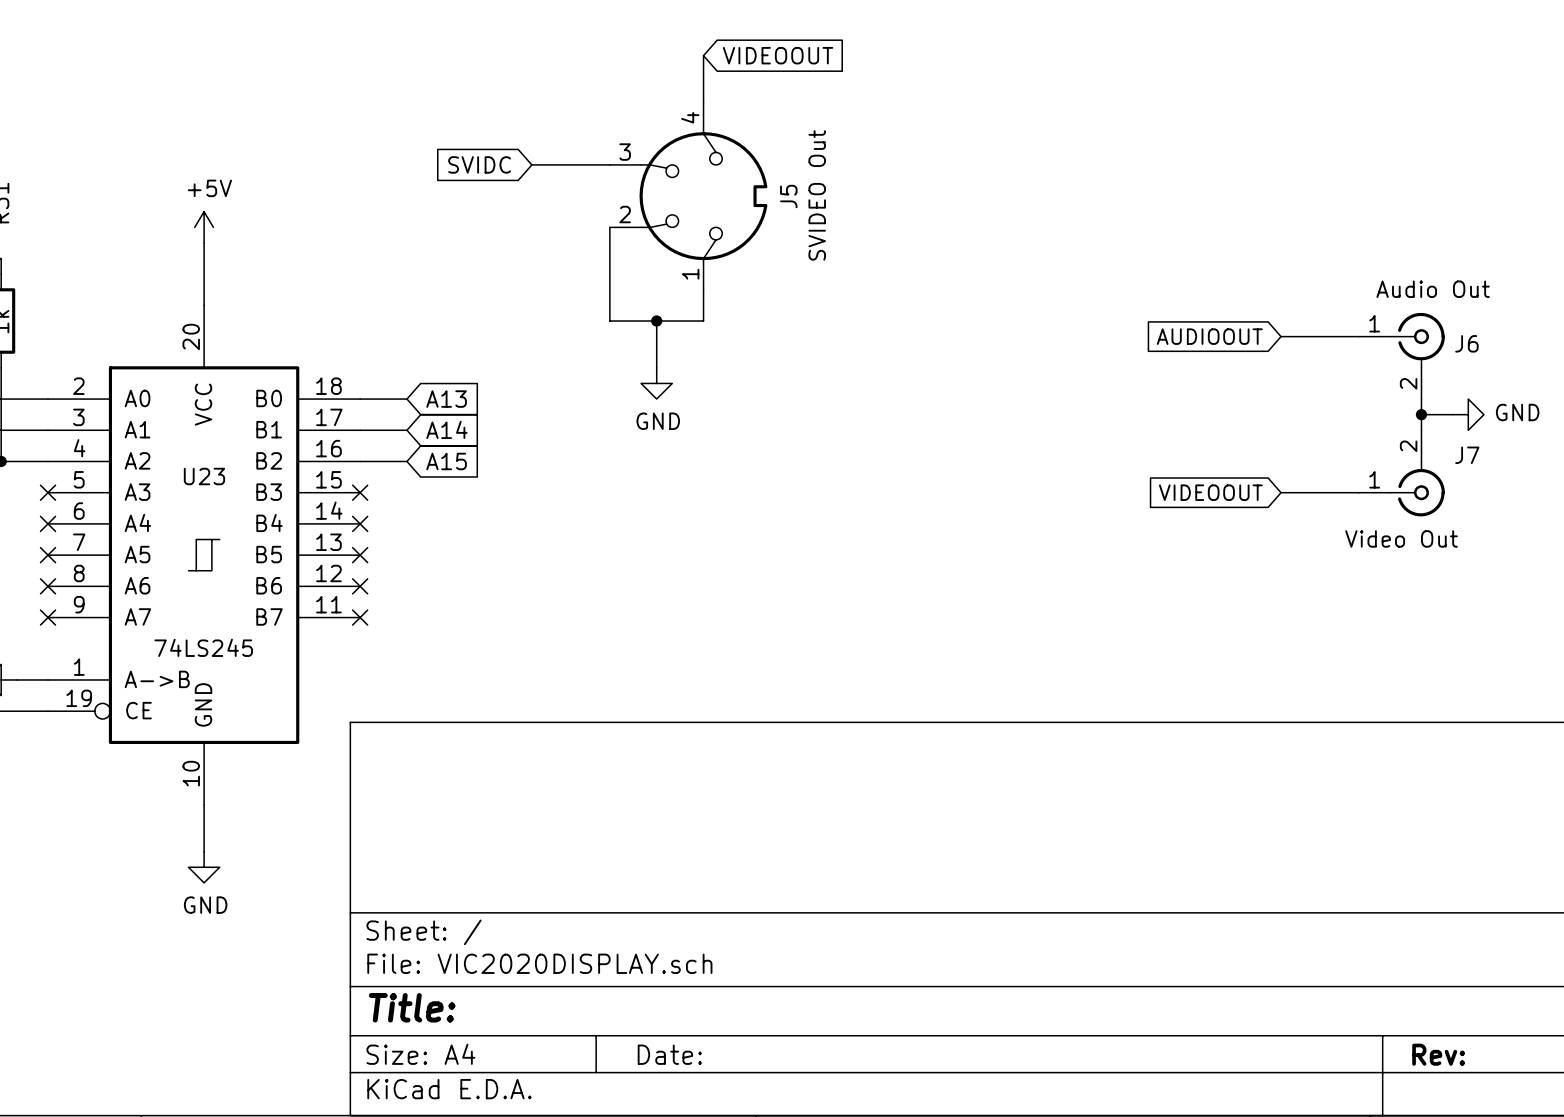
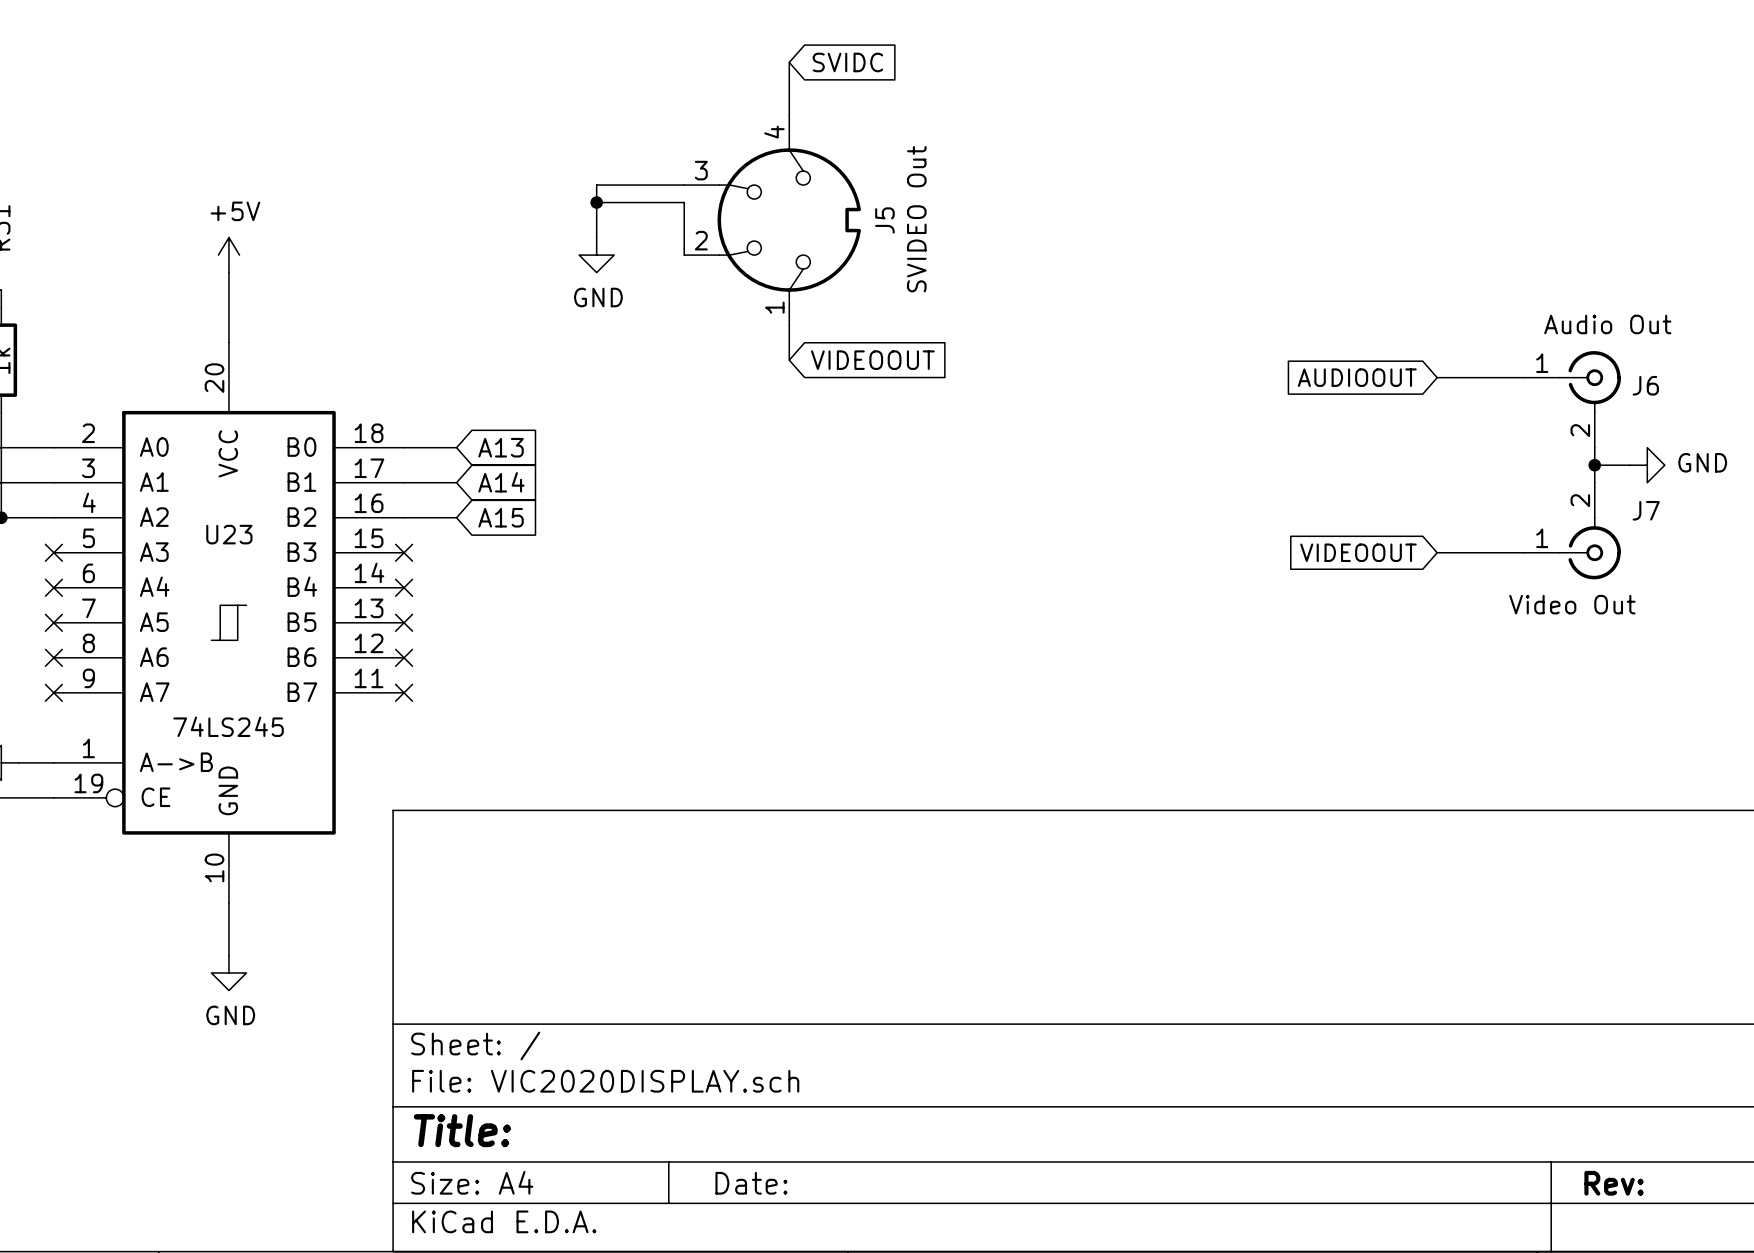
global label: VIDEOOUT (778, 55) -> SVIDC (847, 62)
global label: SVIDC (479, 164) -> none
junction: none -> (596, 202)
wire: (609, 227) (609, 321) (703, 321) -> (684, 255) (684, 202) (596, 202)
wire: (656, 321) (656, 367) -> (596, 185) (596, 237)
junction: (656, 321) -> none
global label: none -> VIDEOOUT (872, 360)
power symbol position: GND (656, 383) -> GND (596, 255)

